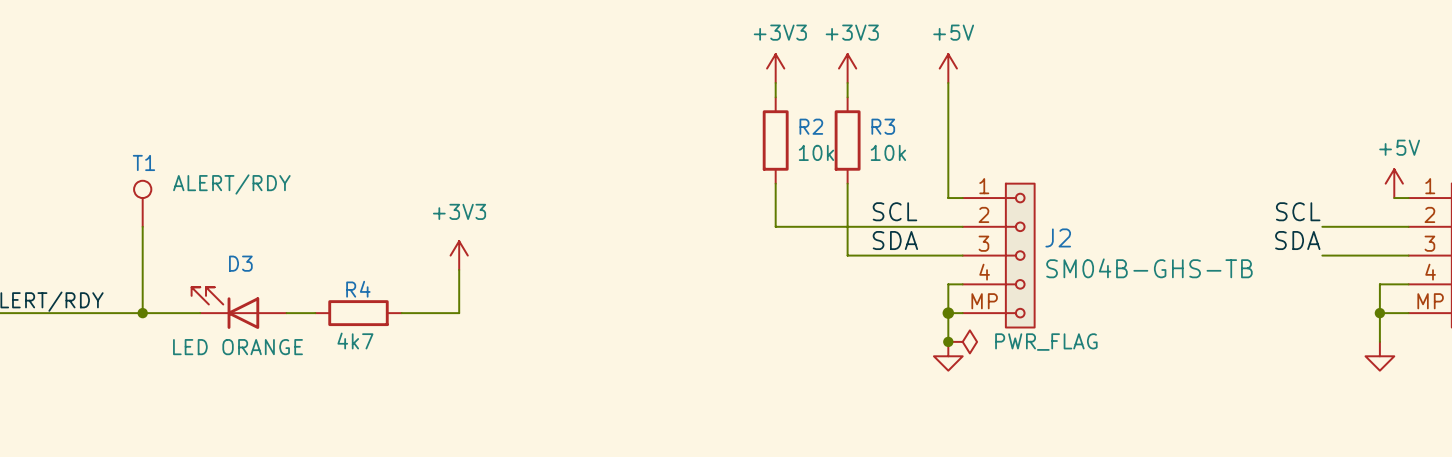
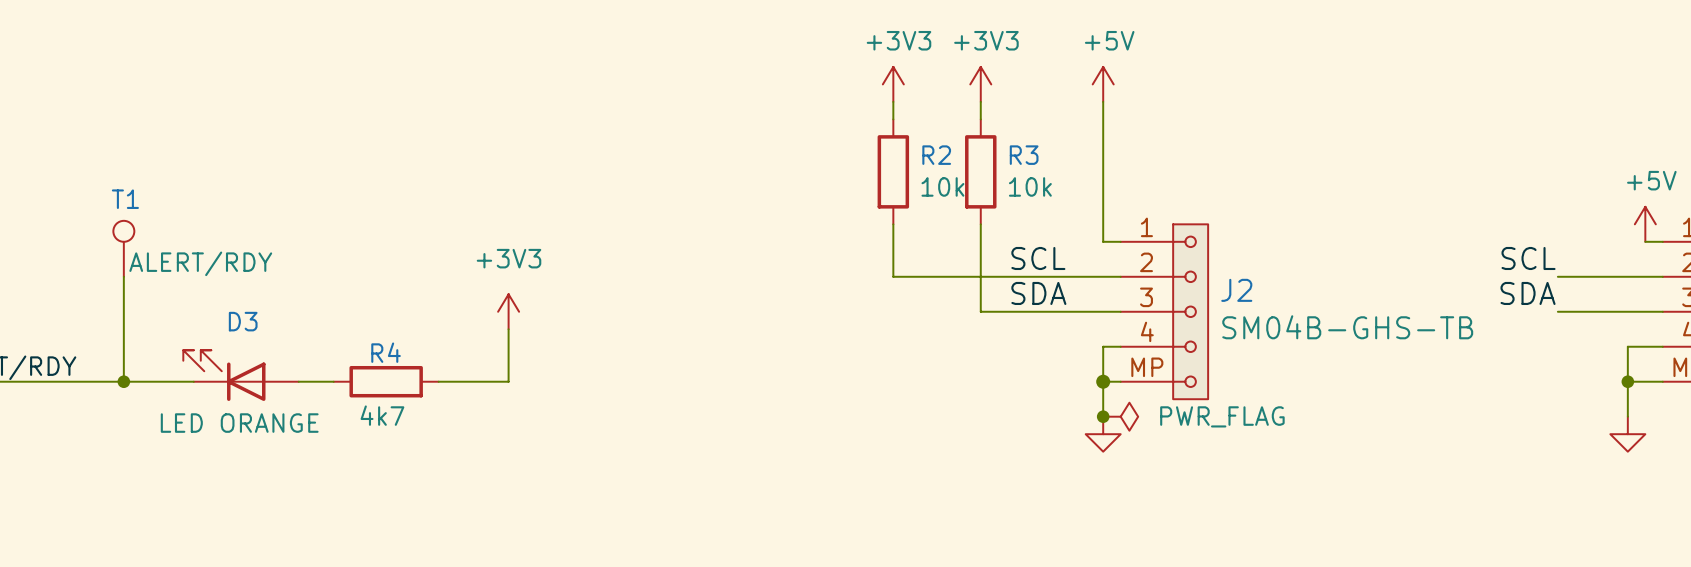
T1 value position: ALERT/RDY (231, 184) -> ALERT/RDY (200, 263)

